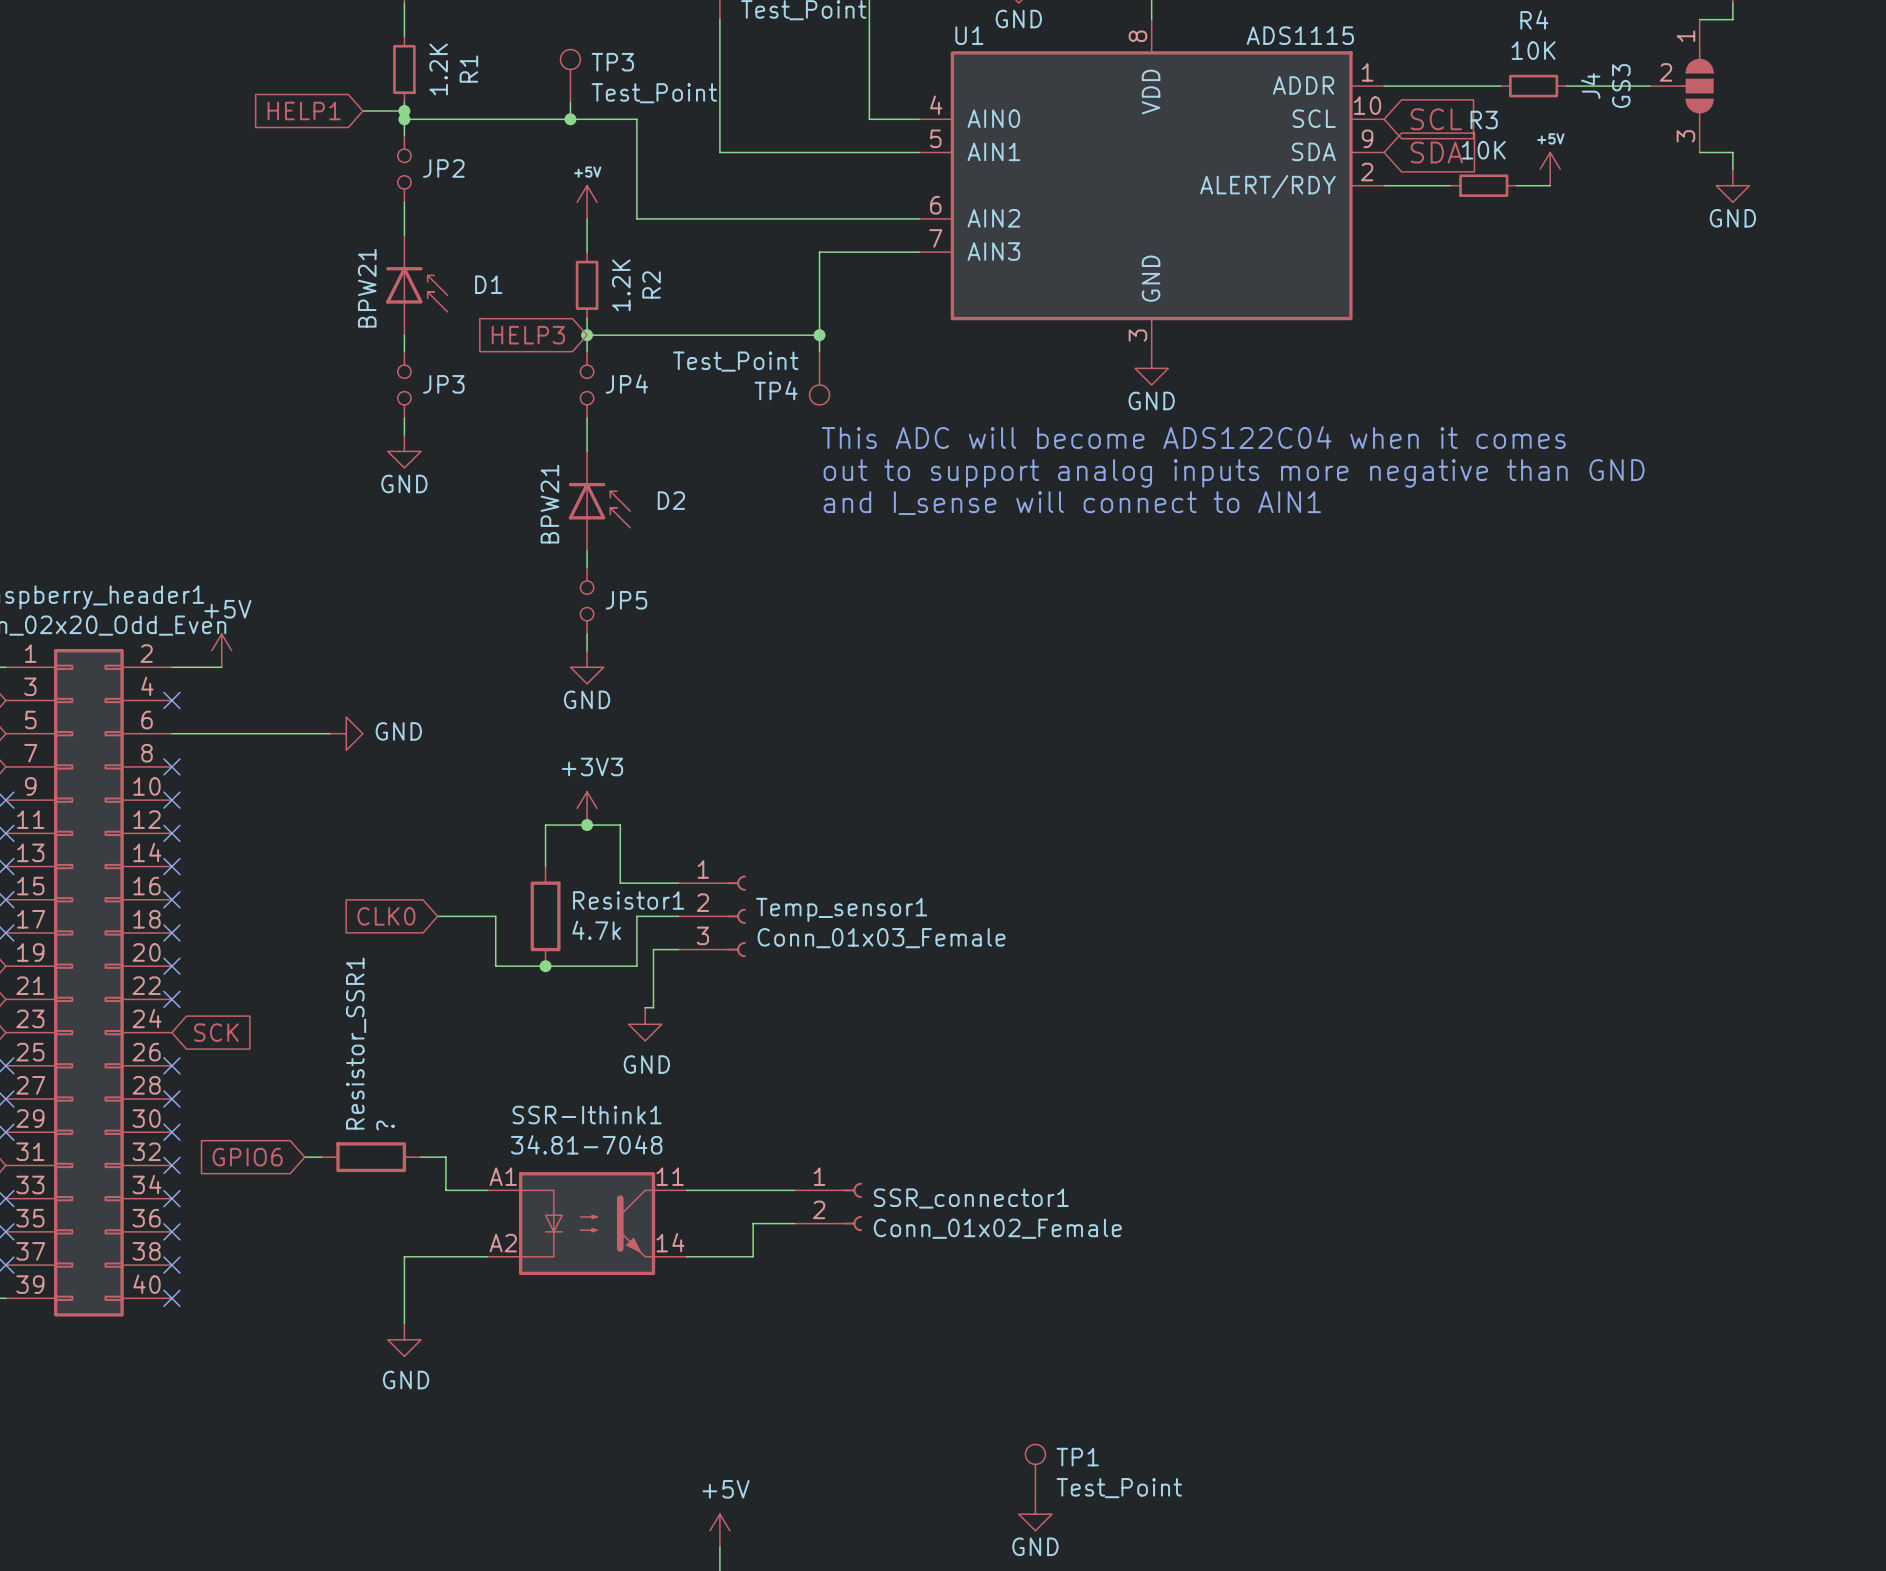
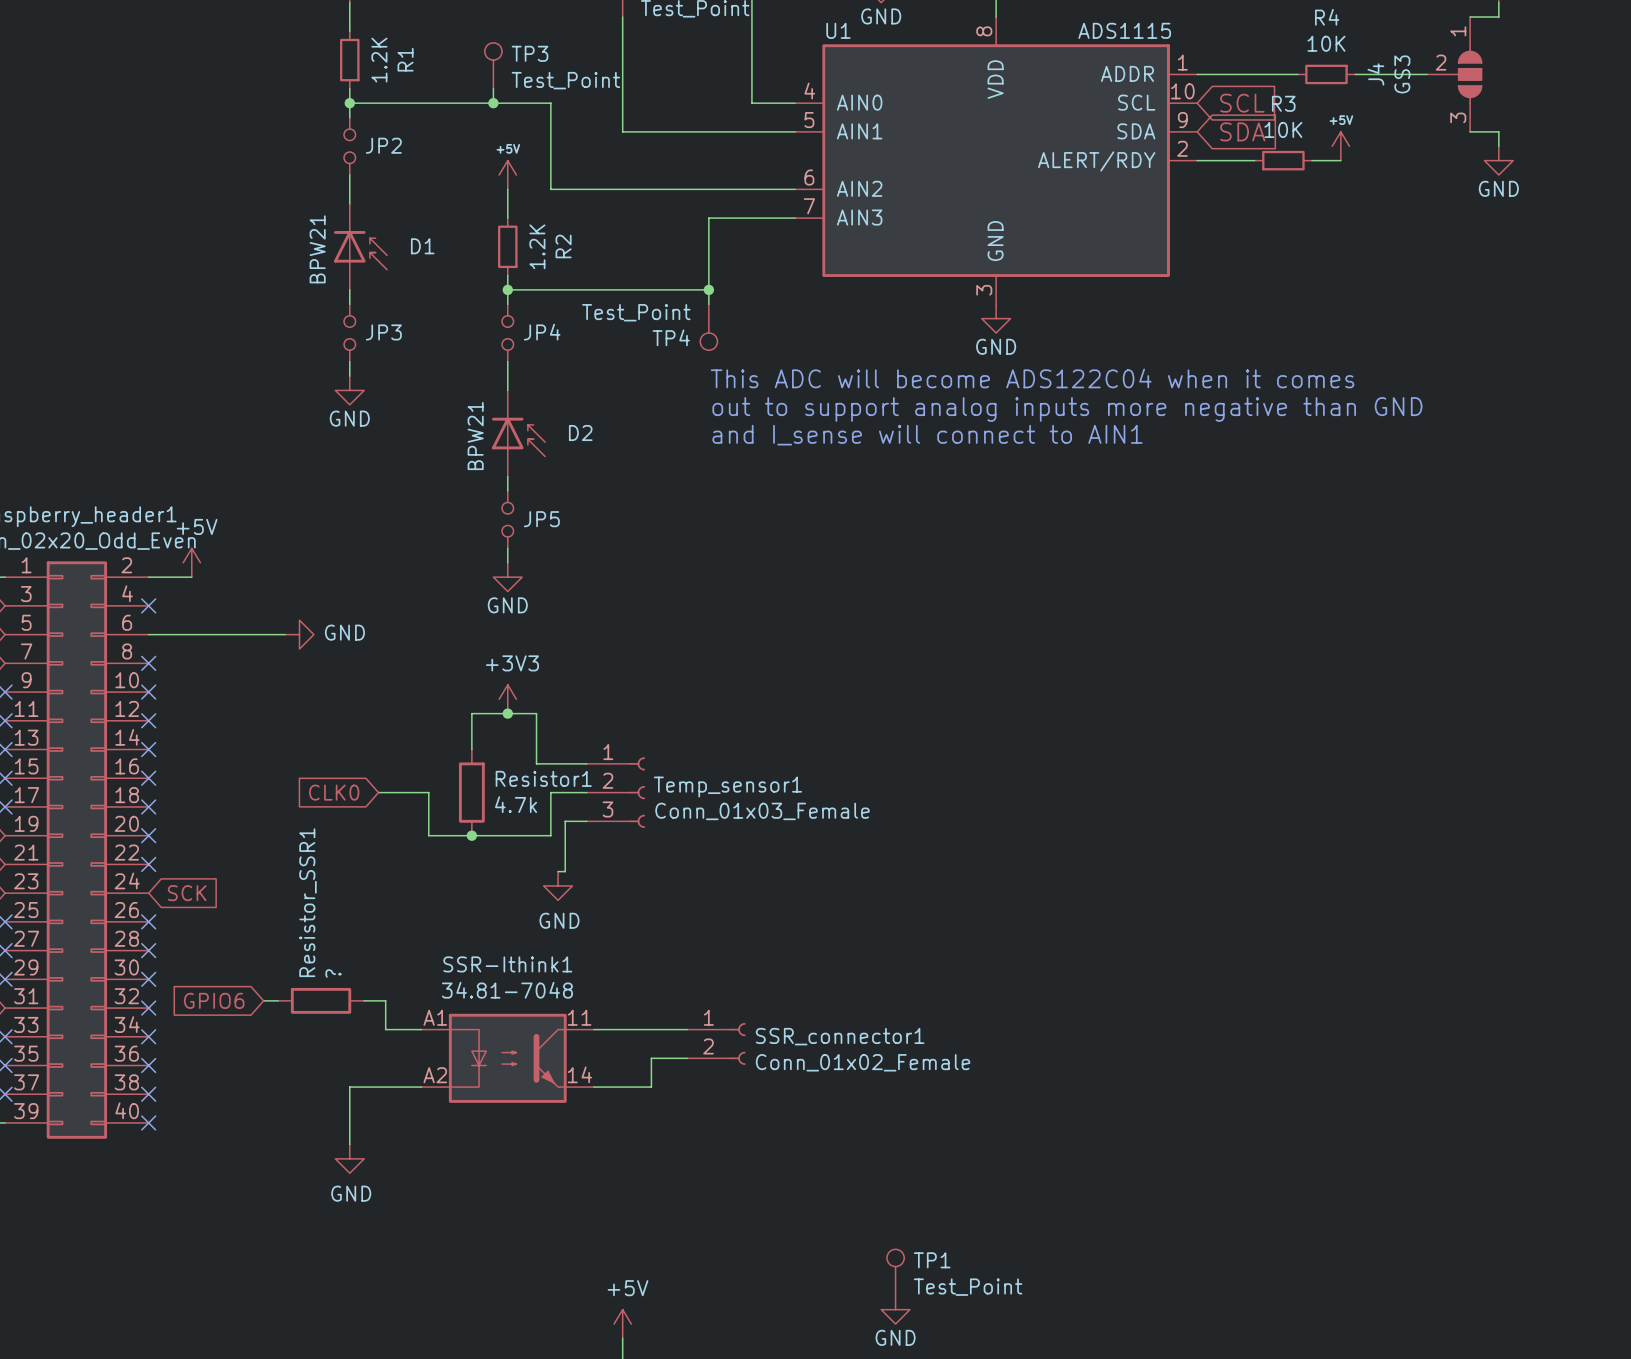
global label: HELP1 (304, 110) -> none
wire: (362, 110) (404, 110) -> none
junction: (404, 110) -> none
global label: HELP3 (528, 335) -> none

